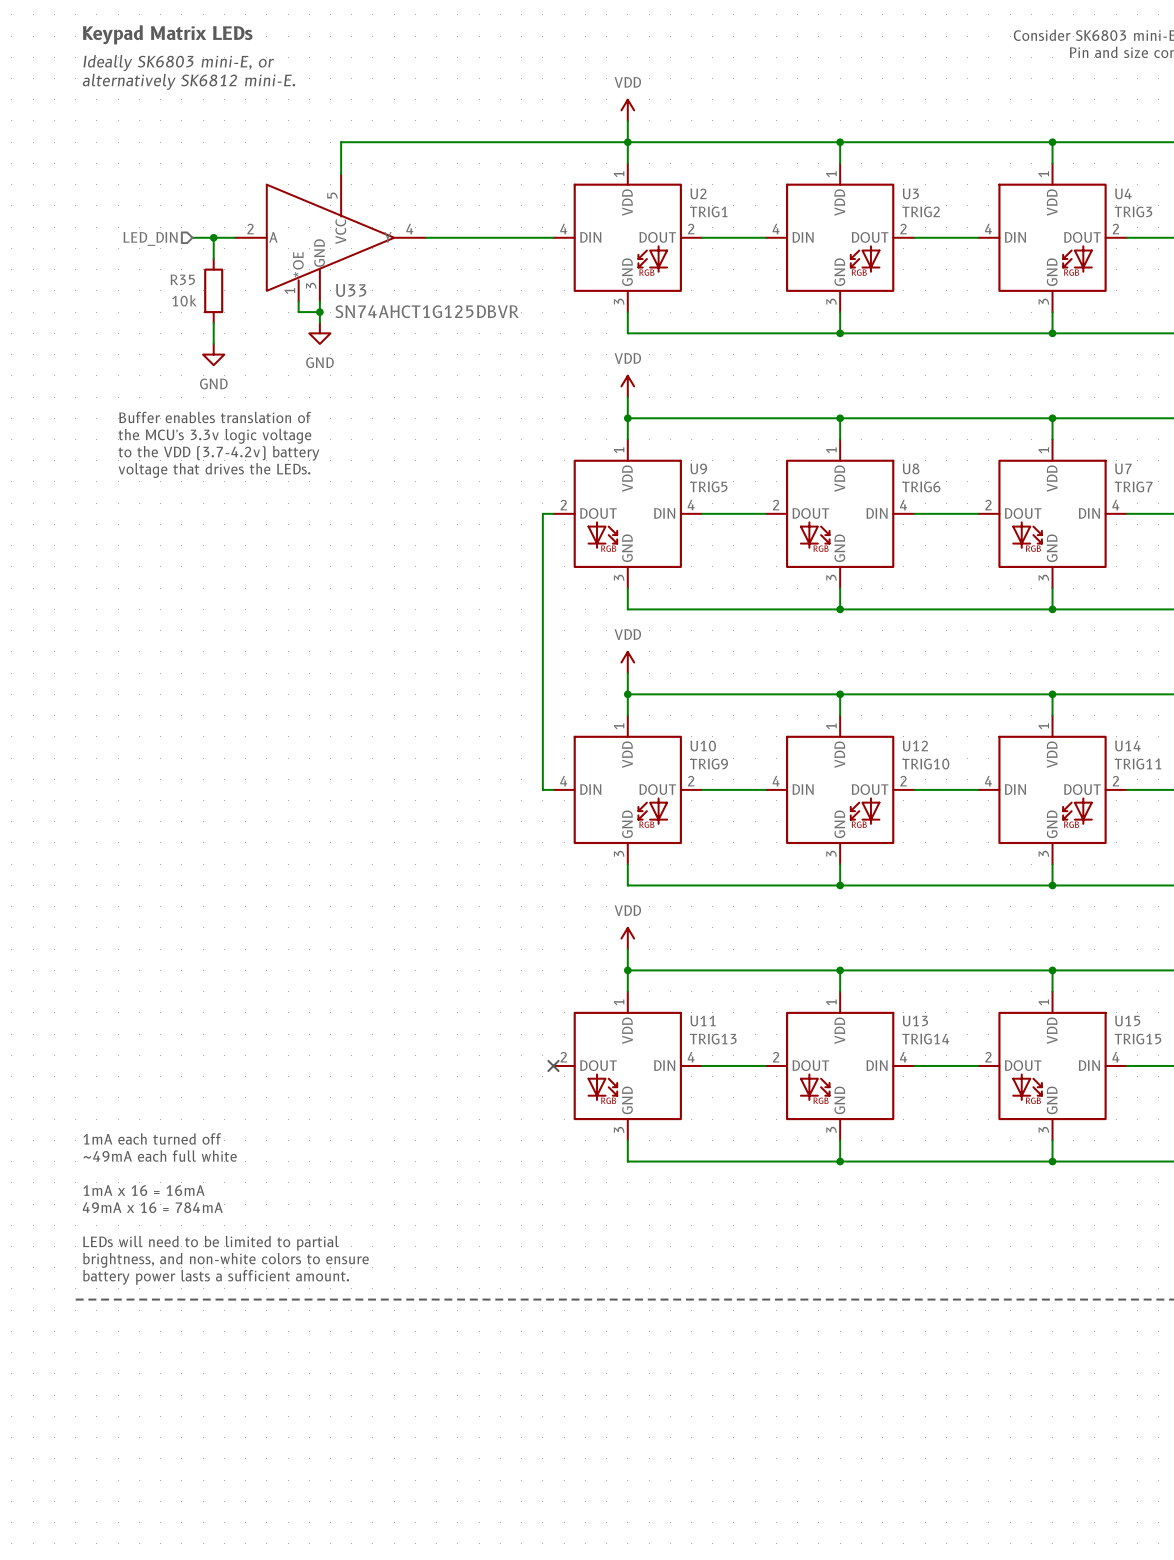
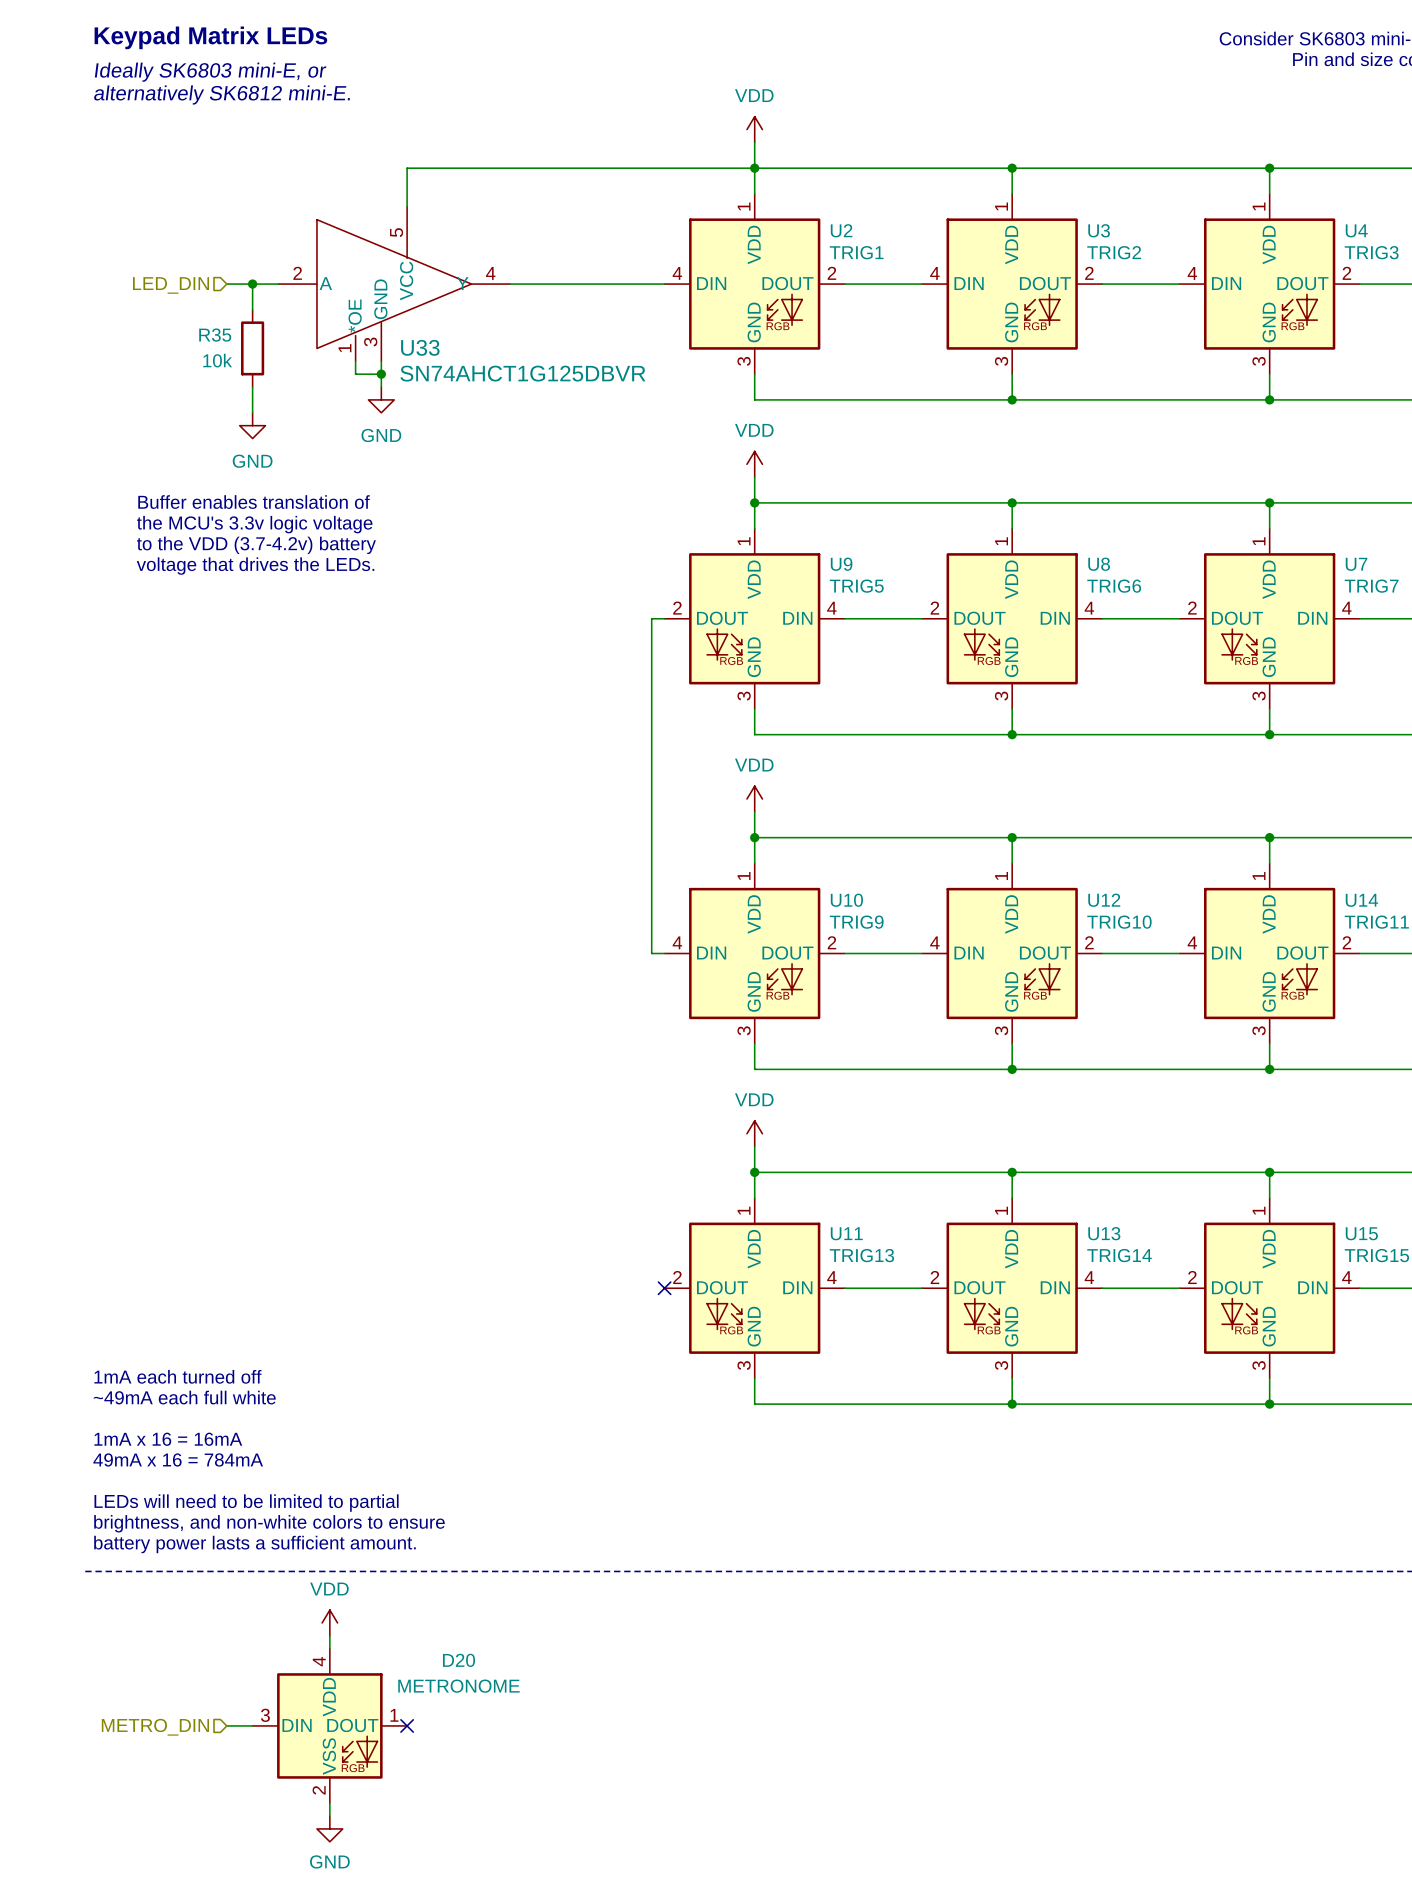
power symbol: none -> VDD (329, 1622)
wire: none -> (329, 1635) (329, 1648)
wire: none -> (226, 1725) (252, 1725)
D20: none -> METRONOME (329, 1725)
no-connect mark: none -> (407, 1725)
hierarchical label: none -> METRO_DIN (155, 1727)
wire: none -> (329, 1803) (329, 1816)
power symbol: none -> GND (329, 1828)

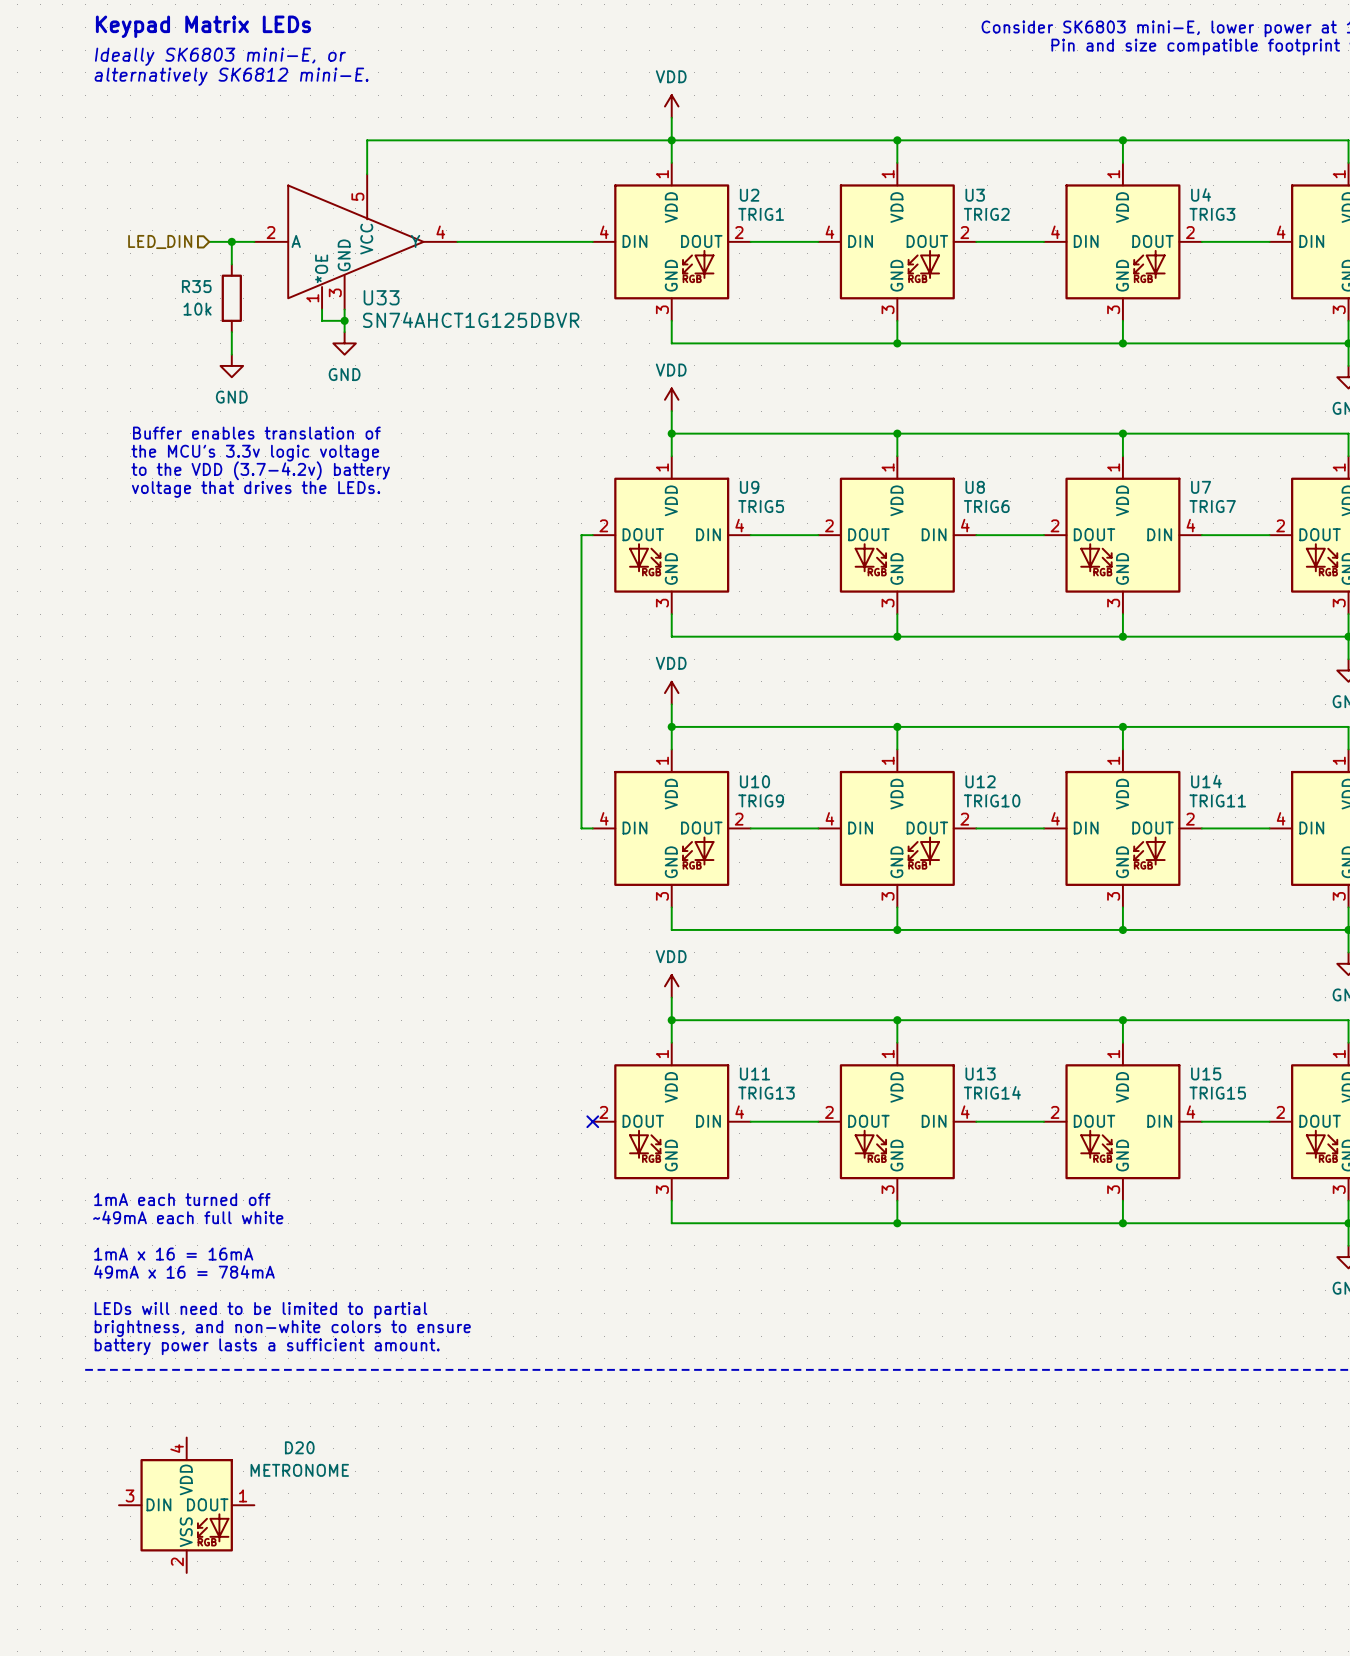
power symbol: VDD (329, 1622) -> none
wire: (329, 1635) (329, 1648) -> none
D20 position: (329, 1725) -> (186, 1505)
no-connect mark: (407, 1725) -> none
hierarchical label: METRO_DIN (155, 1727) -> none
wire: (329, 1803) (329, 1816) -> none
power symbol: GND (329, 1828) -> none

